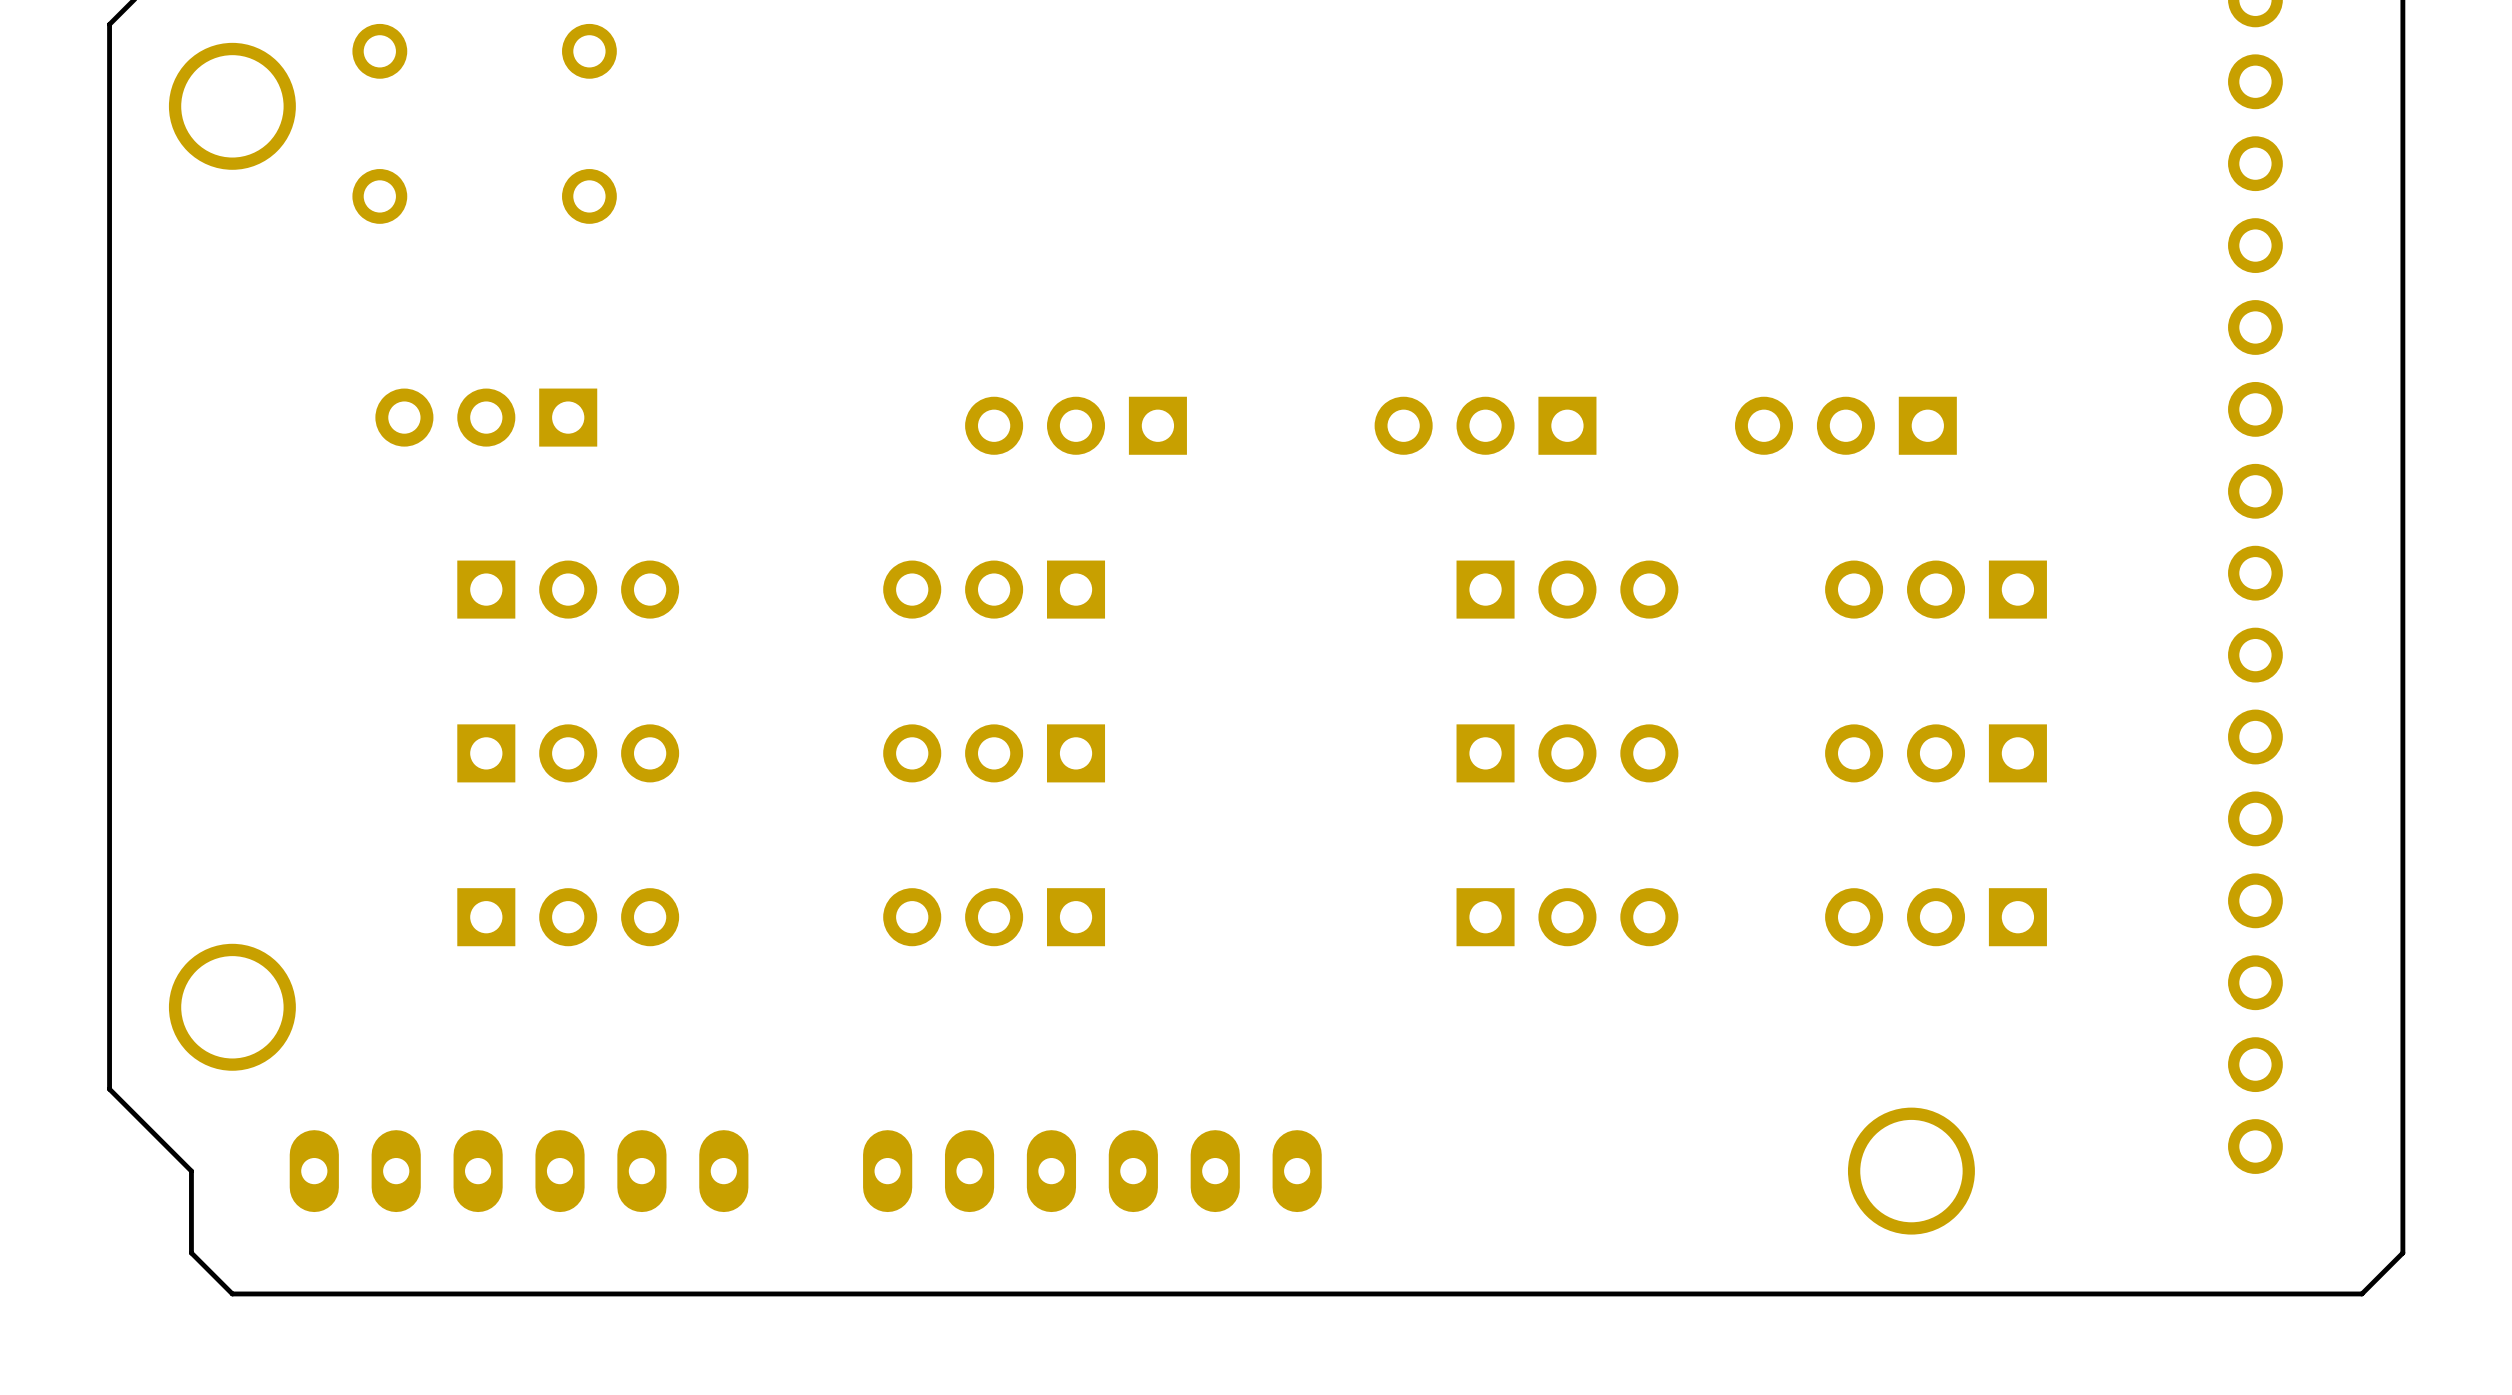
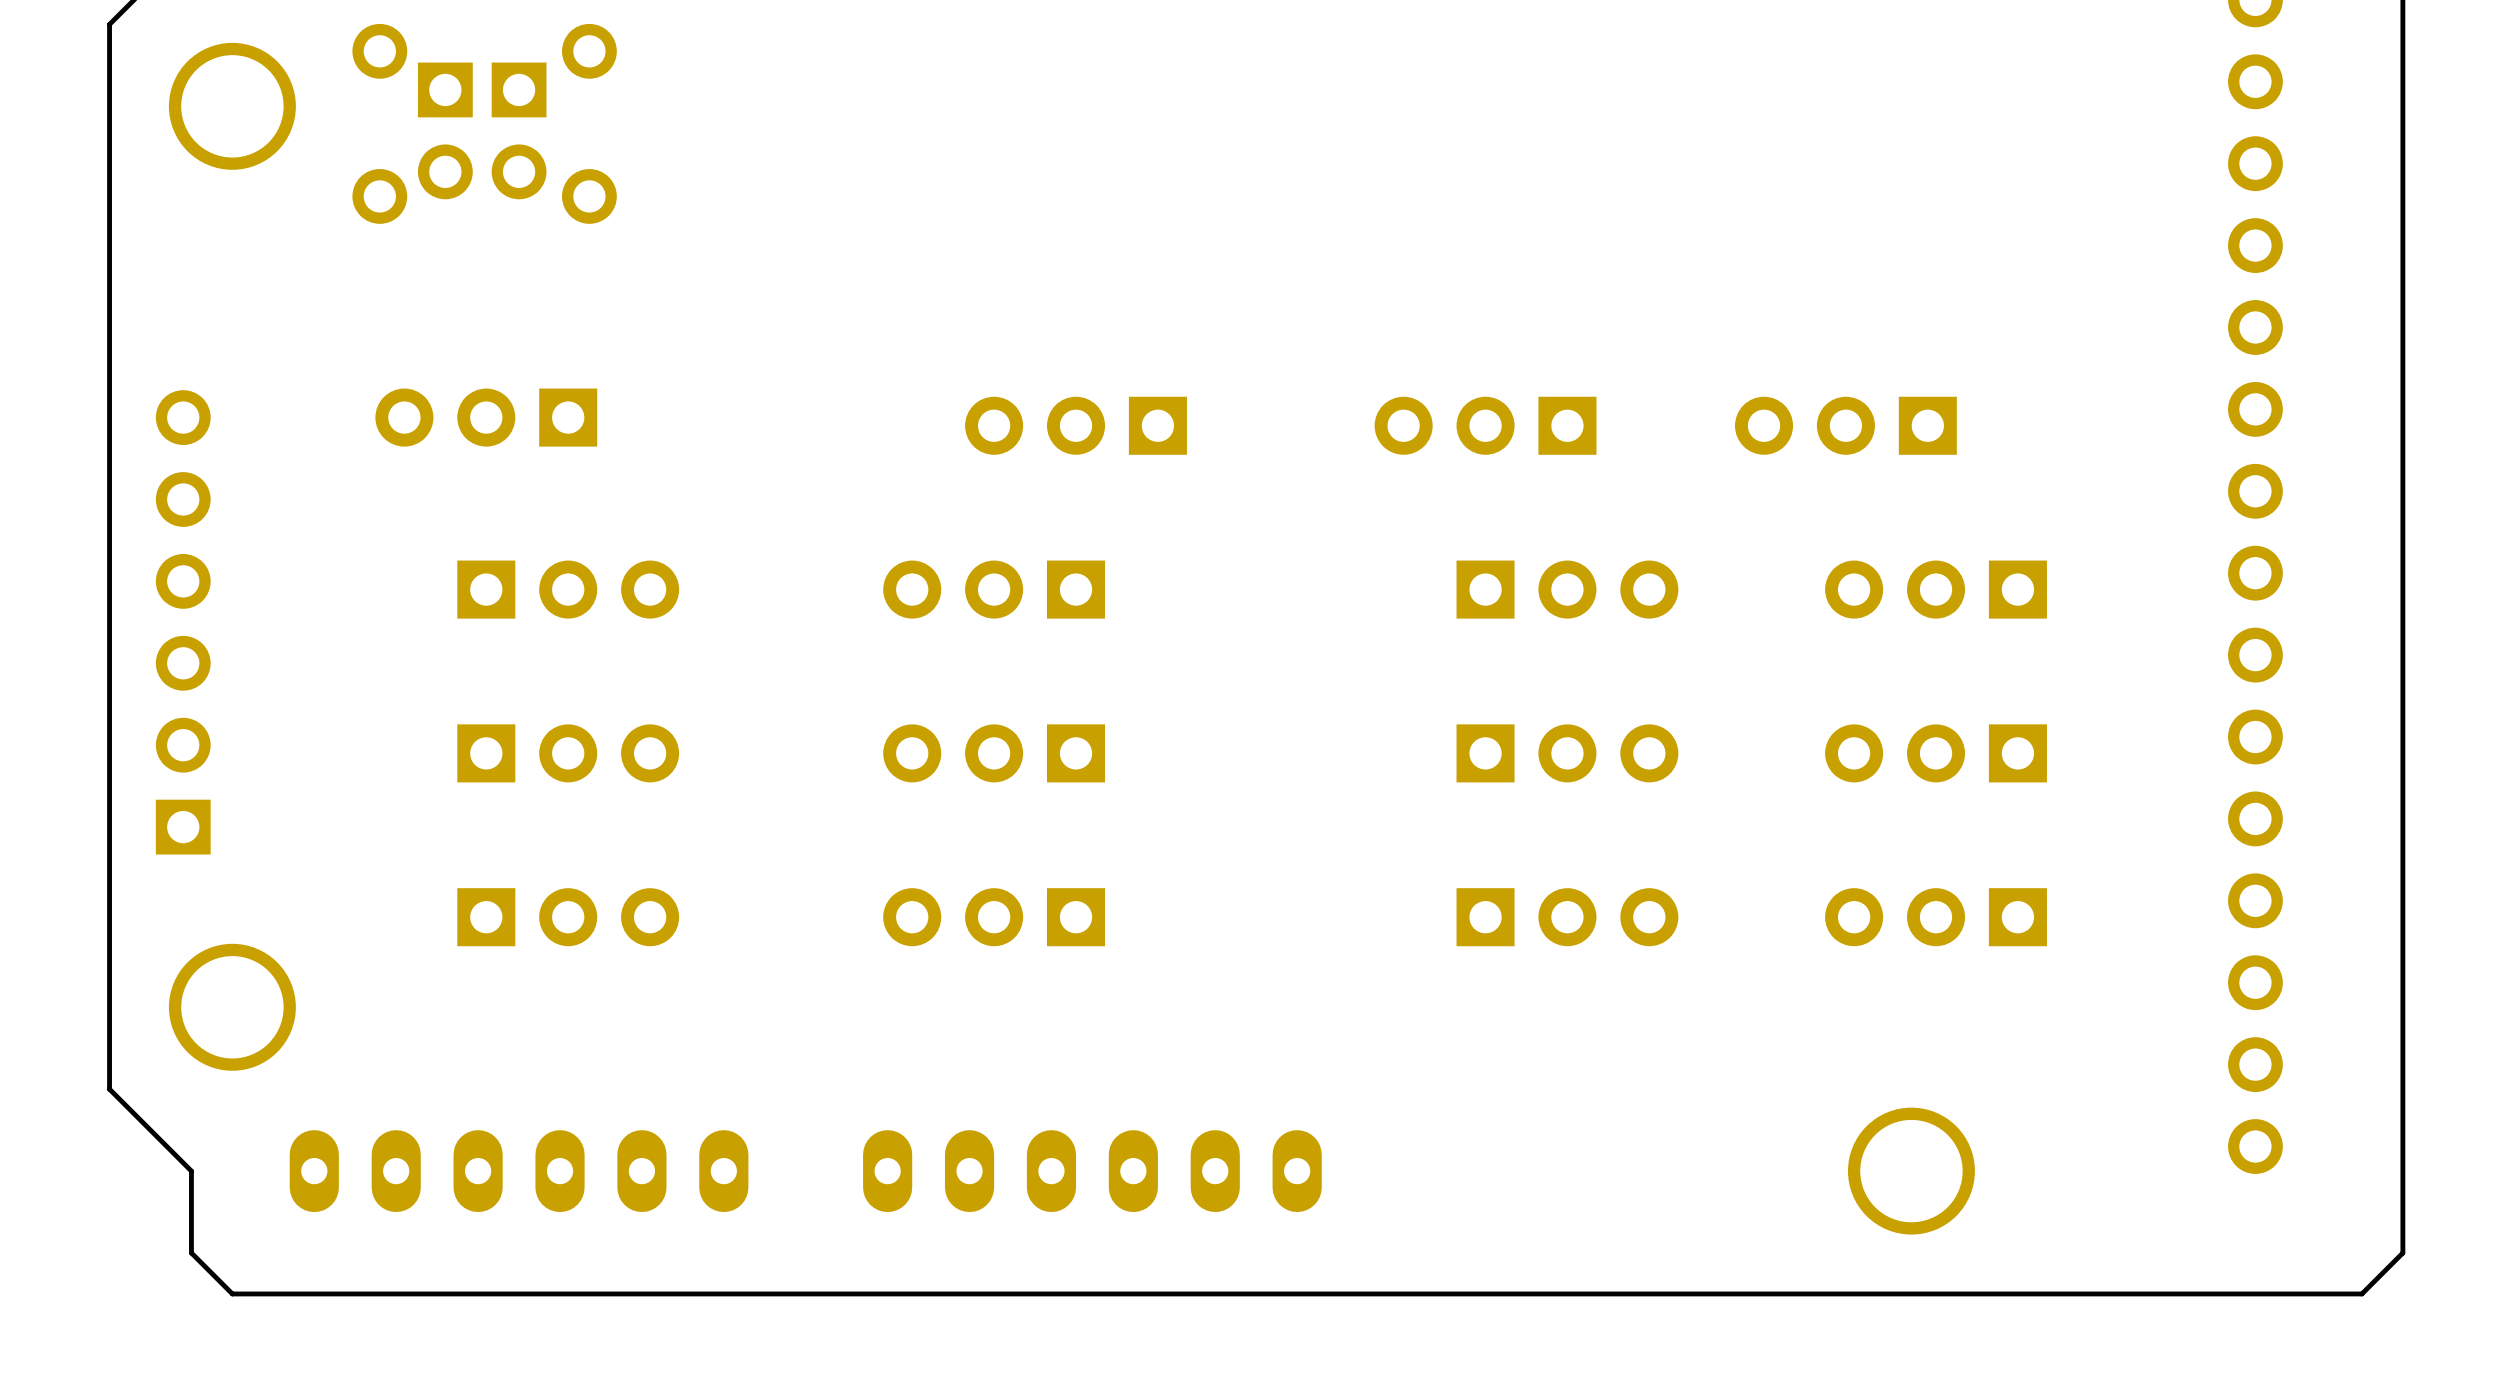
part: none -> (445, 130)
part: none -> (519, 130)
part: none -> (183, 622)

